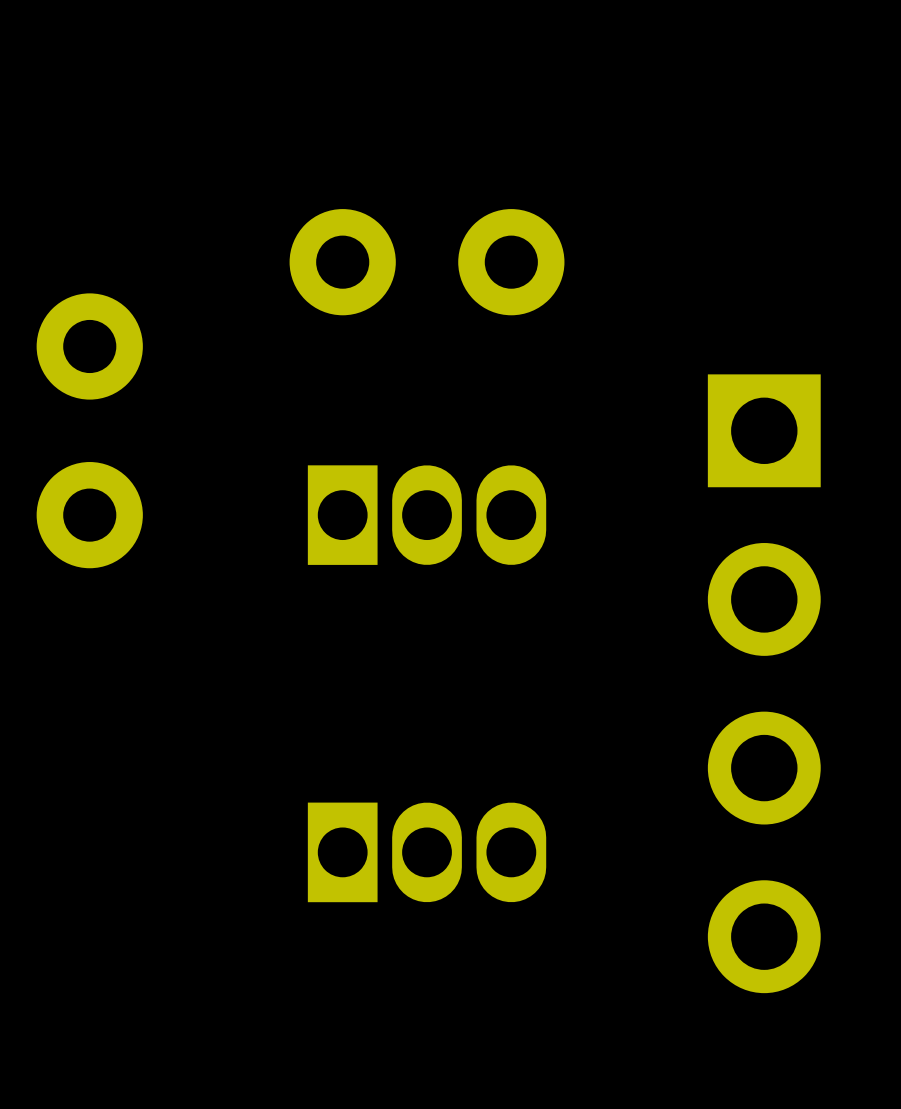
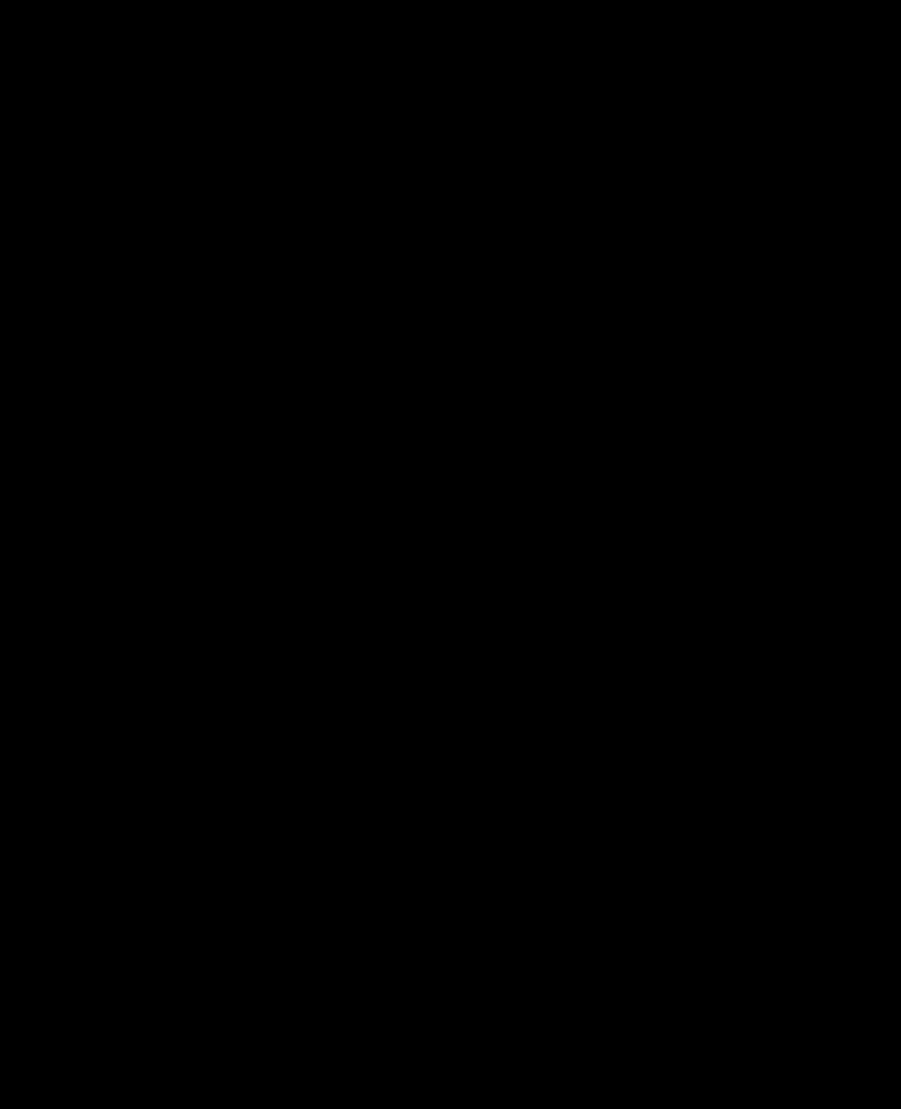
part: (427, 262) -> none
part: (89, 430) -> none
part: (427, 515) -> none
part: (764, 683) -> none
part: (427, 852) -> none

